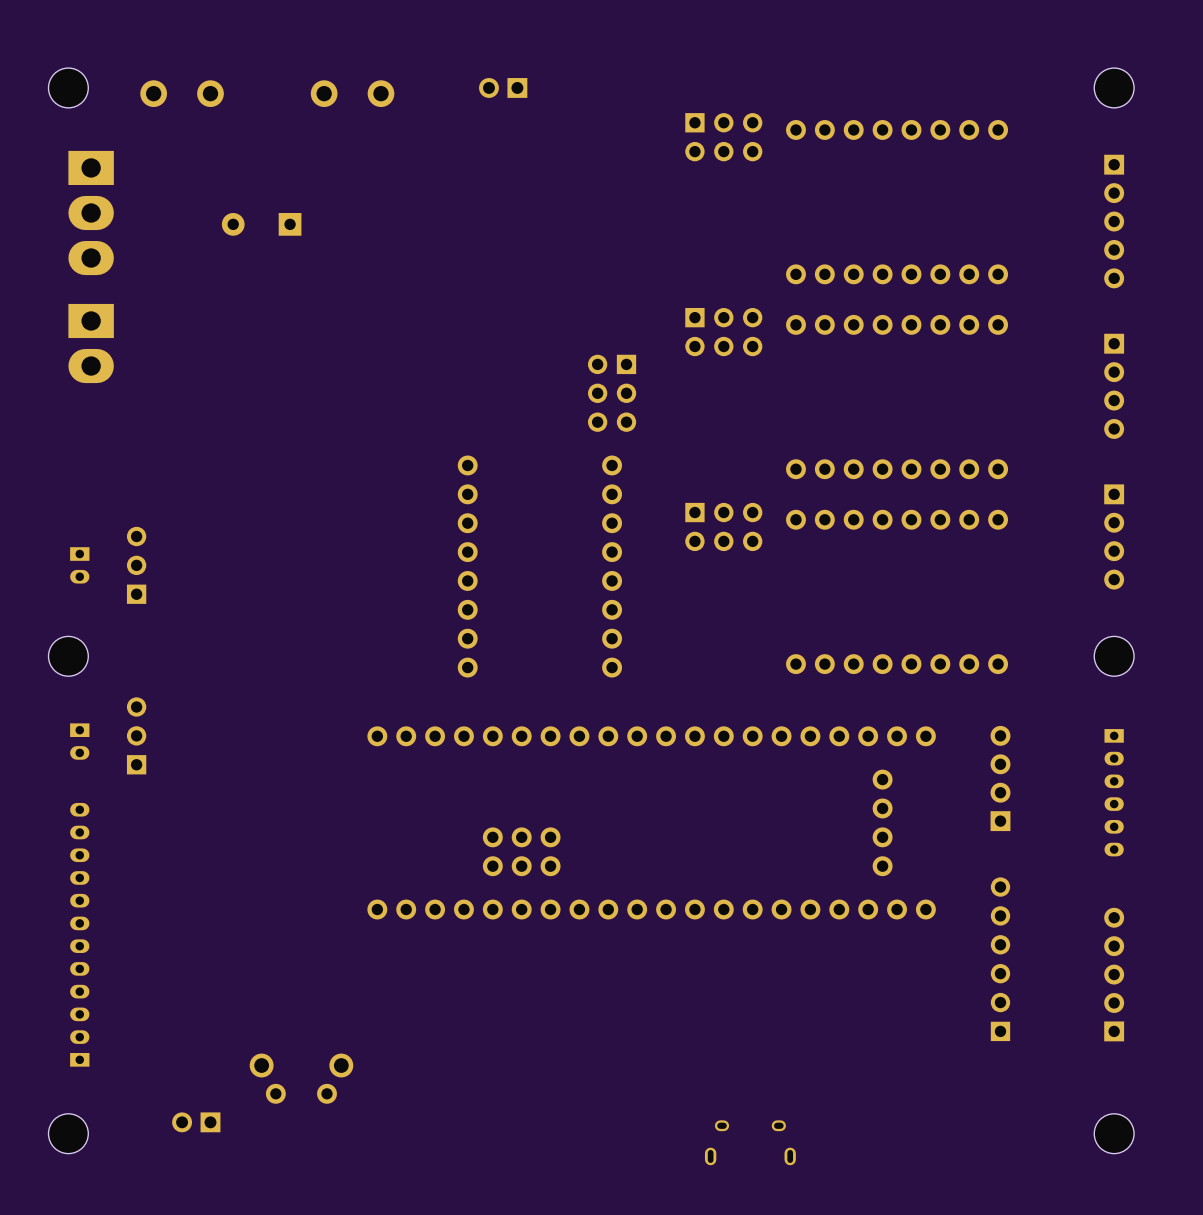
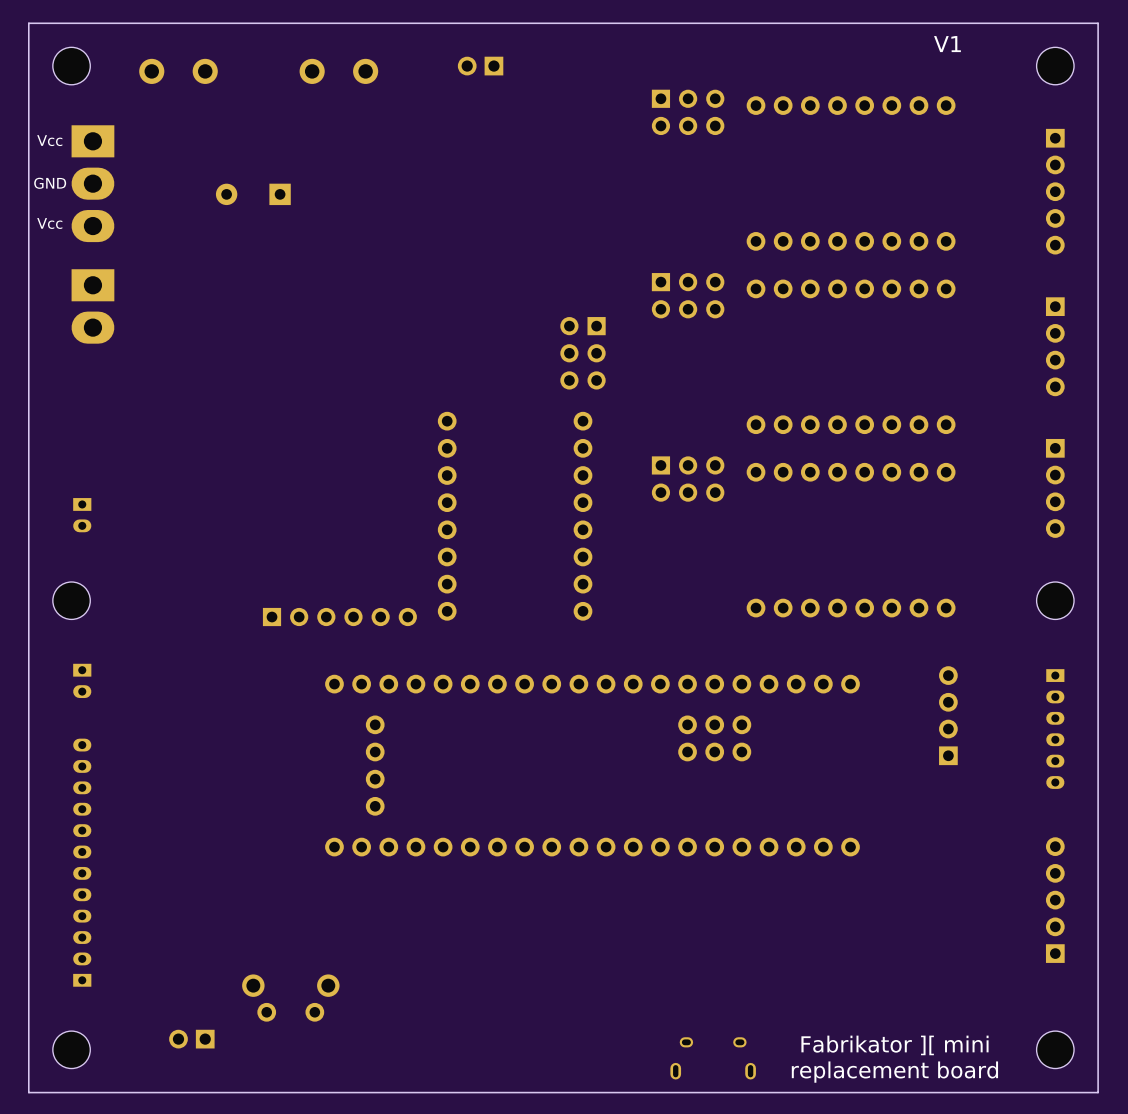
board edge: none -> (1098, 23) (1098, 1092) (28, 1092) (28, 23) (1098, 23)
text: none -> V1 (947, 44)
text: none -> Vcc (49, 140)
text: none -> GND (50, 183)
text: none -> Vcc (49, 223)
part: (136, 565) -> none
part: none -> (339, 617)
part: (136, 735) -> none
part rotation: 0° (651, 822) -> 180° (592, 765)
part: (1000, 959) -> none
text: none -> Fabrikator ][ mini (894, 1045)
text: none -> replacement board (894, 1072)

